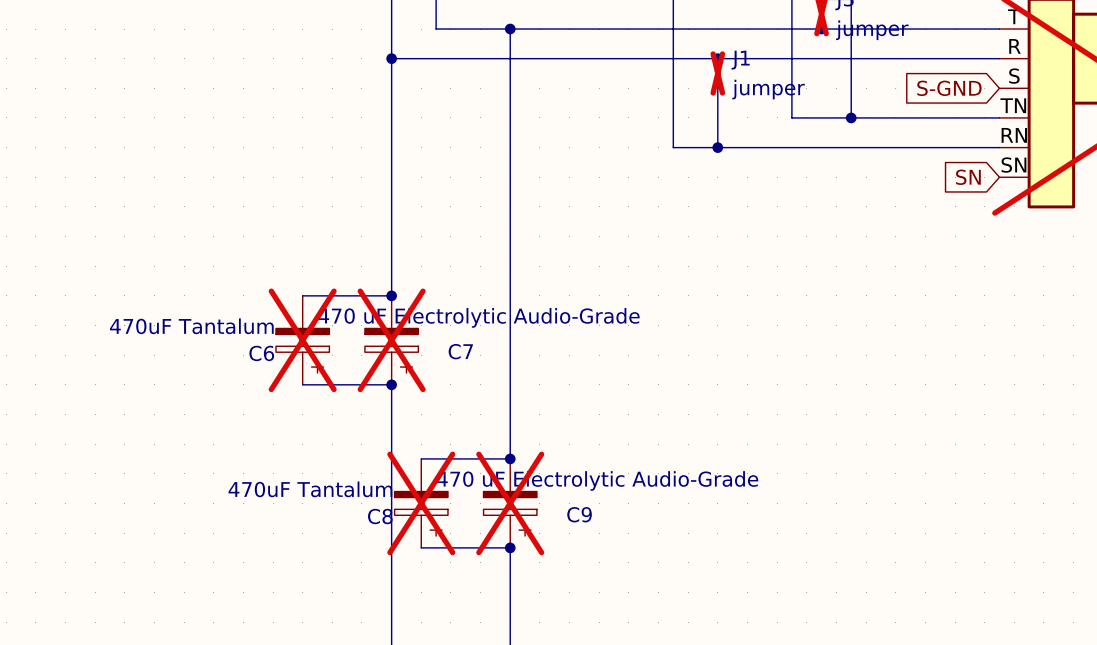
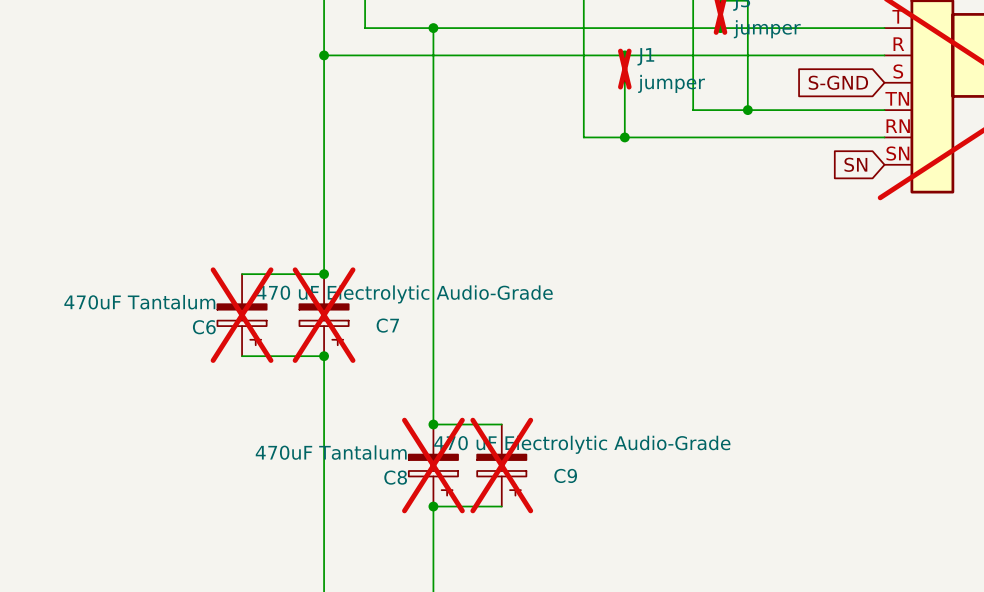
wire: (421, 458) (510, 458) -> (501, 424) (433, 424)
C9 value: 470 uF Electrolytic Audio-Grade (597, 480) -> 470uF Tantalum (331, 452)
C8: 470uF Tantalum (421, 503) -> none
C9: none -> 470 uF Electrolytic Audio-Grade (501, 465)
C9 name: C9 (579, 514) -> C8 (395, 477)
wire: (421, 547) (510, 547) -> (501, 506) (433, 506)

